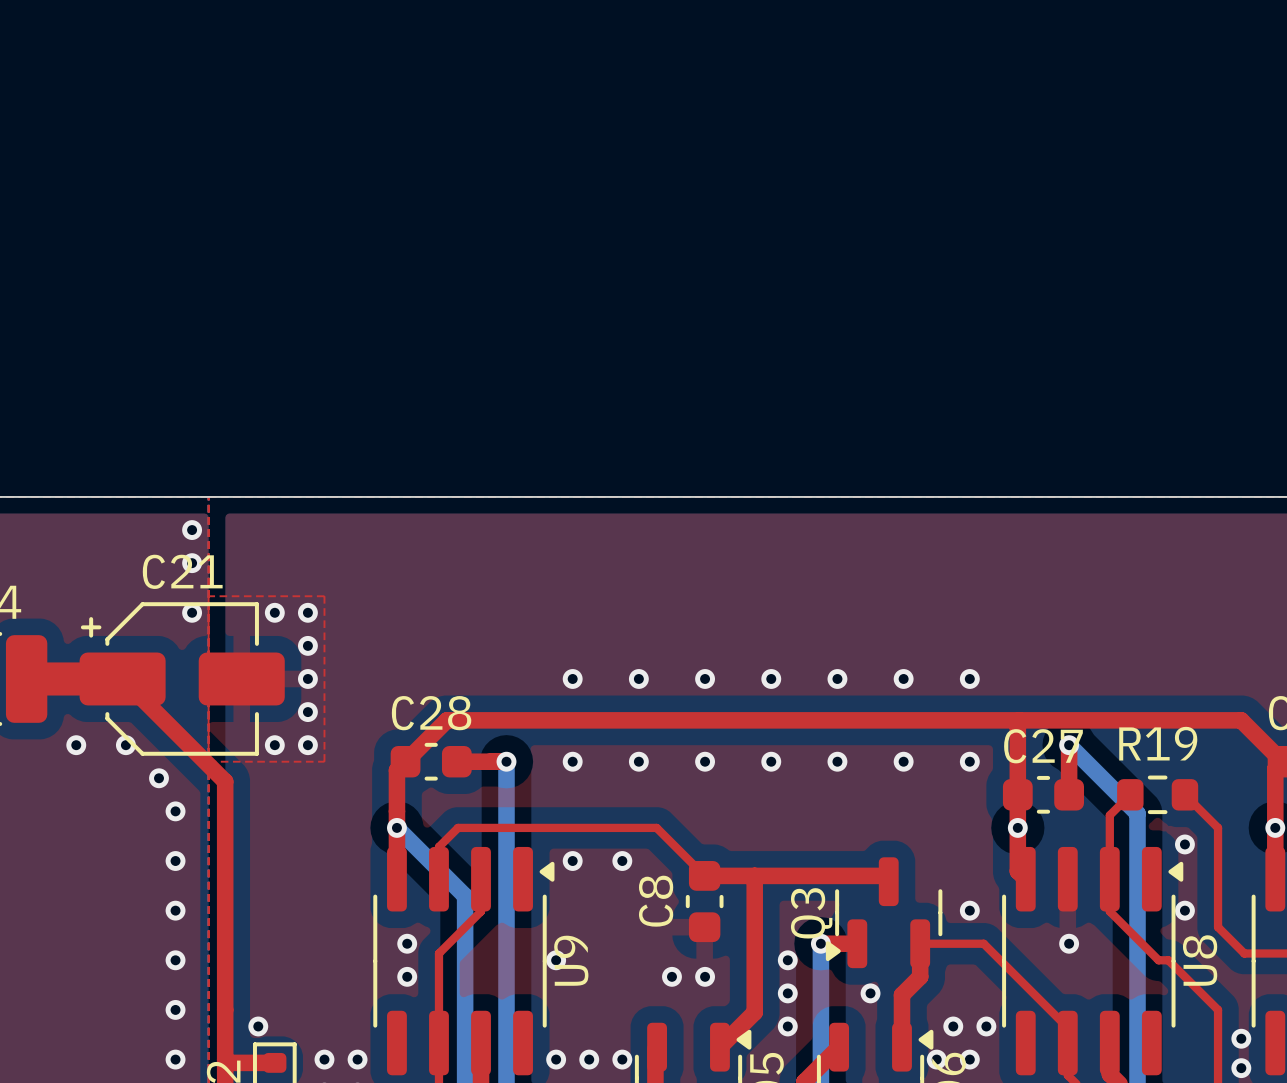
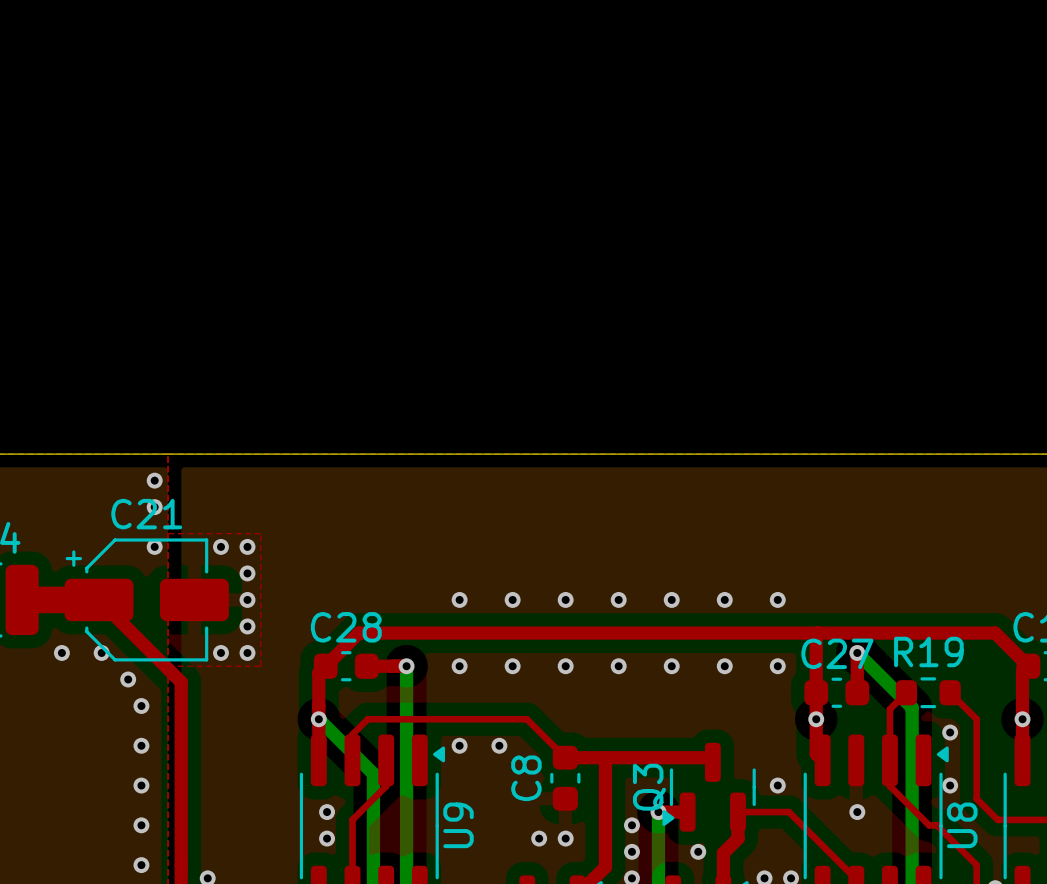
via: (556, 960) -> none

